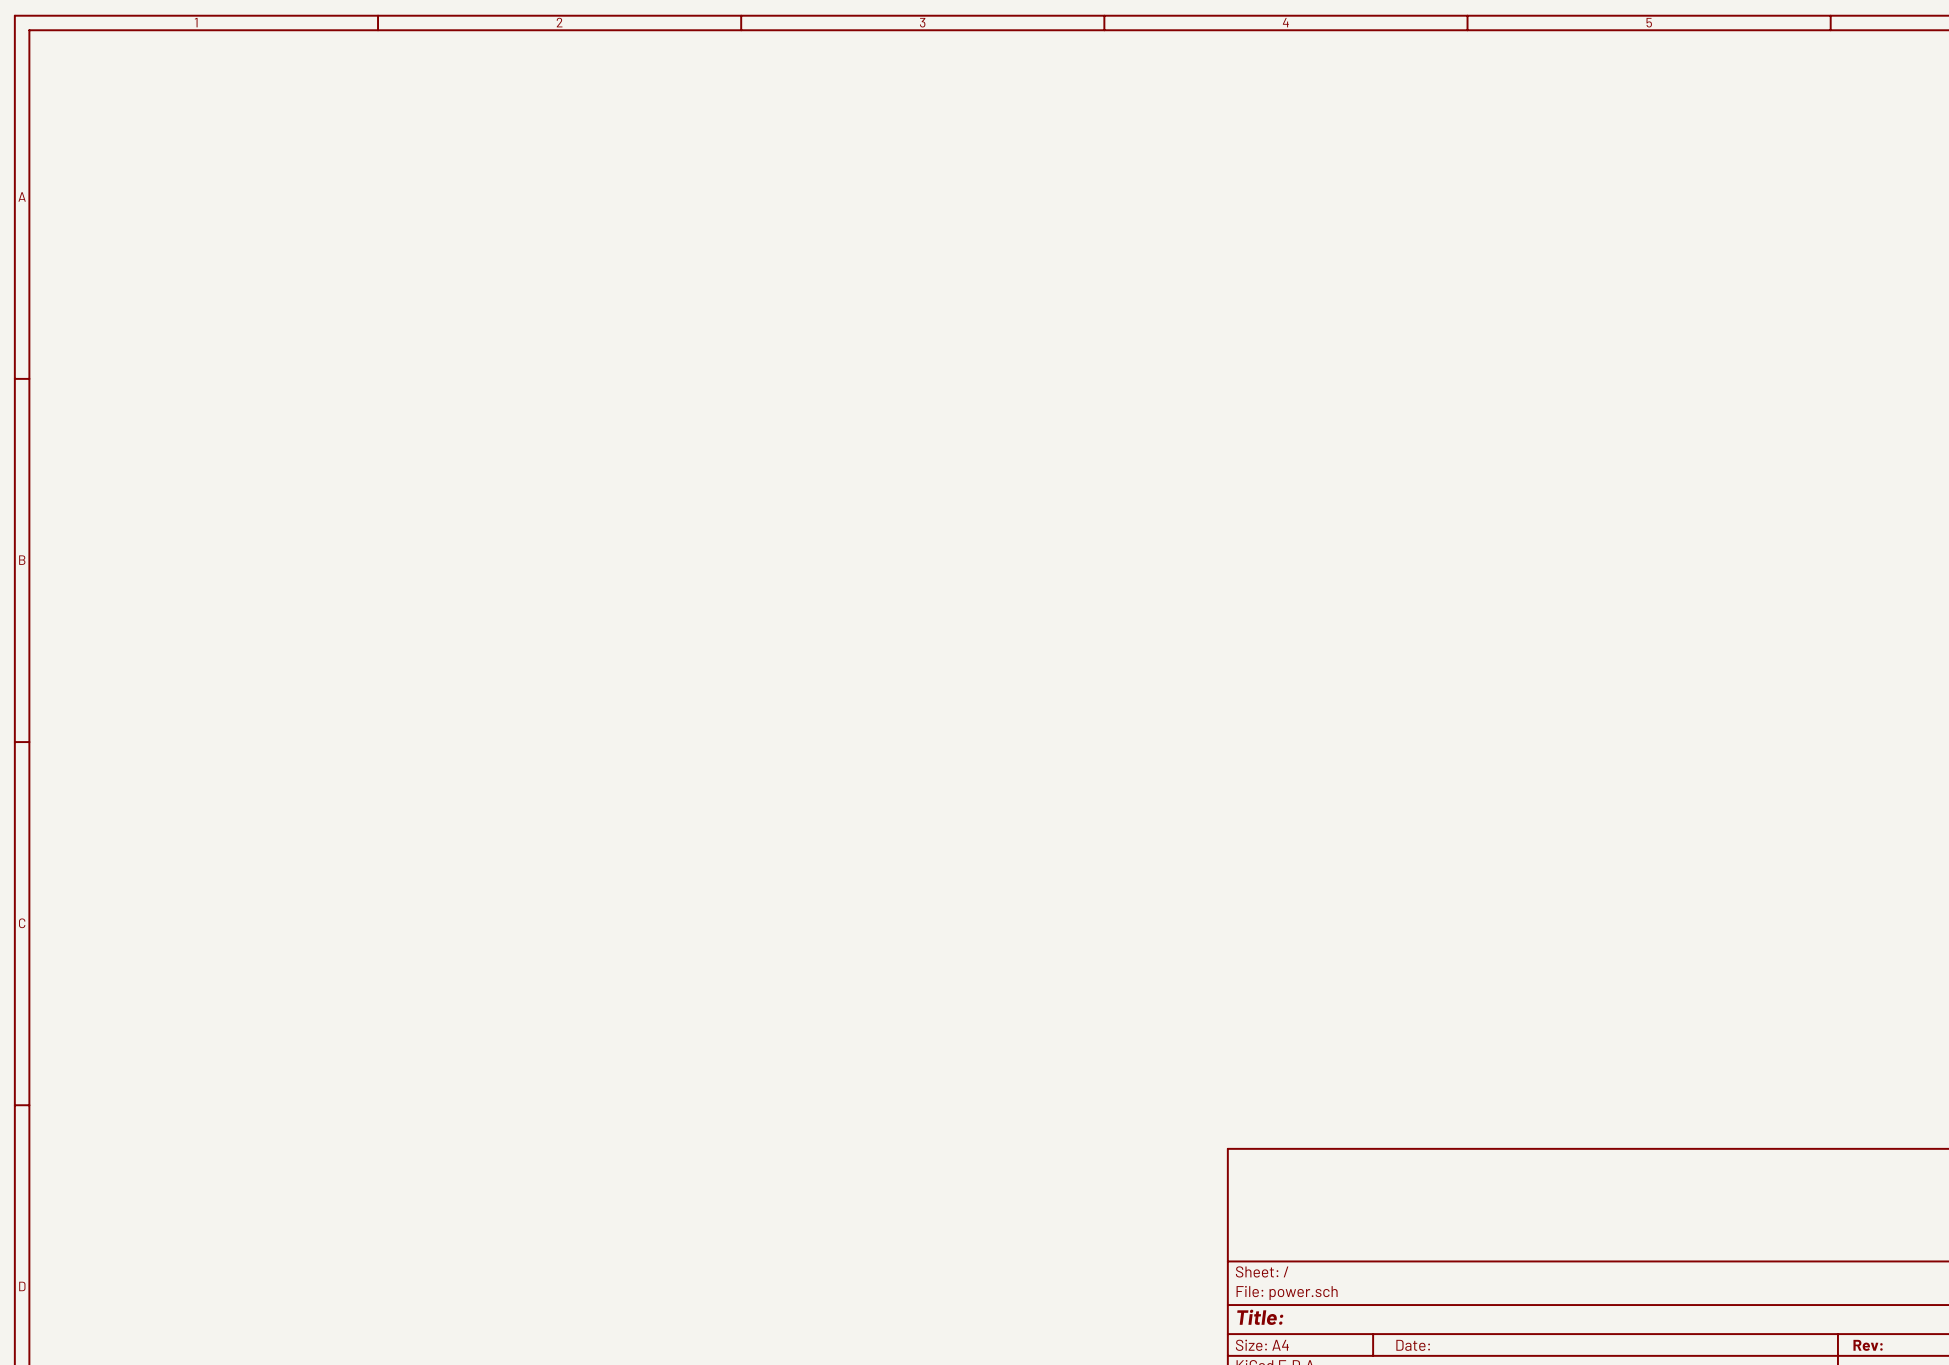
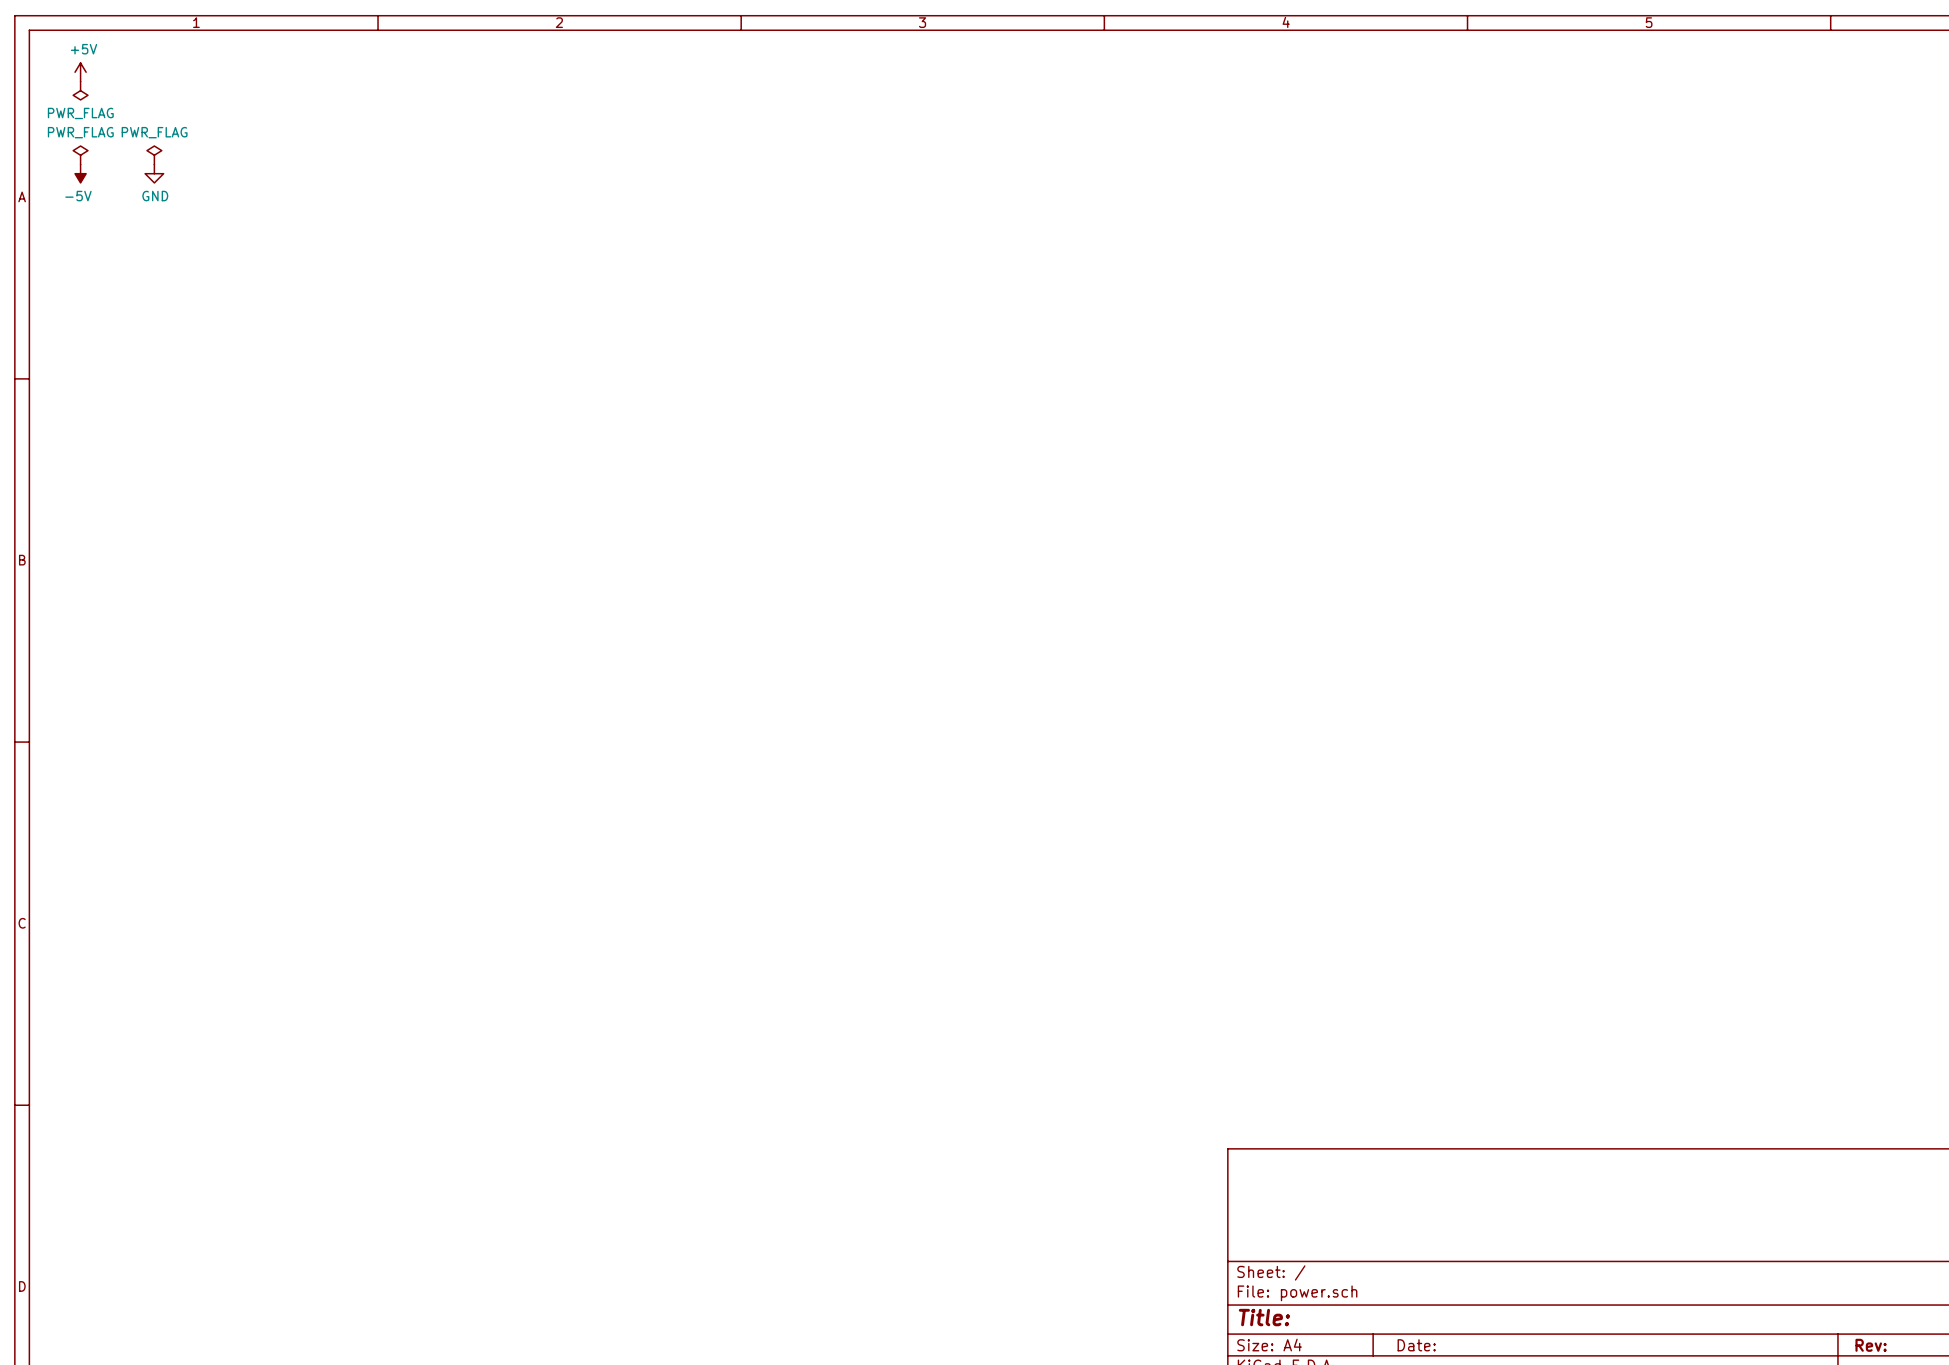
power symbol: none -> +5V (80, 72)
power symbol: none -> PWR_FLAG (80, 90)
power symbol: none -> PWR_FLAG (80, 155)
power symbol: none -> PWR_FLAG (154, 155)
power symbol: none -> -5V (80, 173)
power symbol: none -> GND (154, 173)

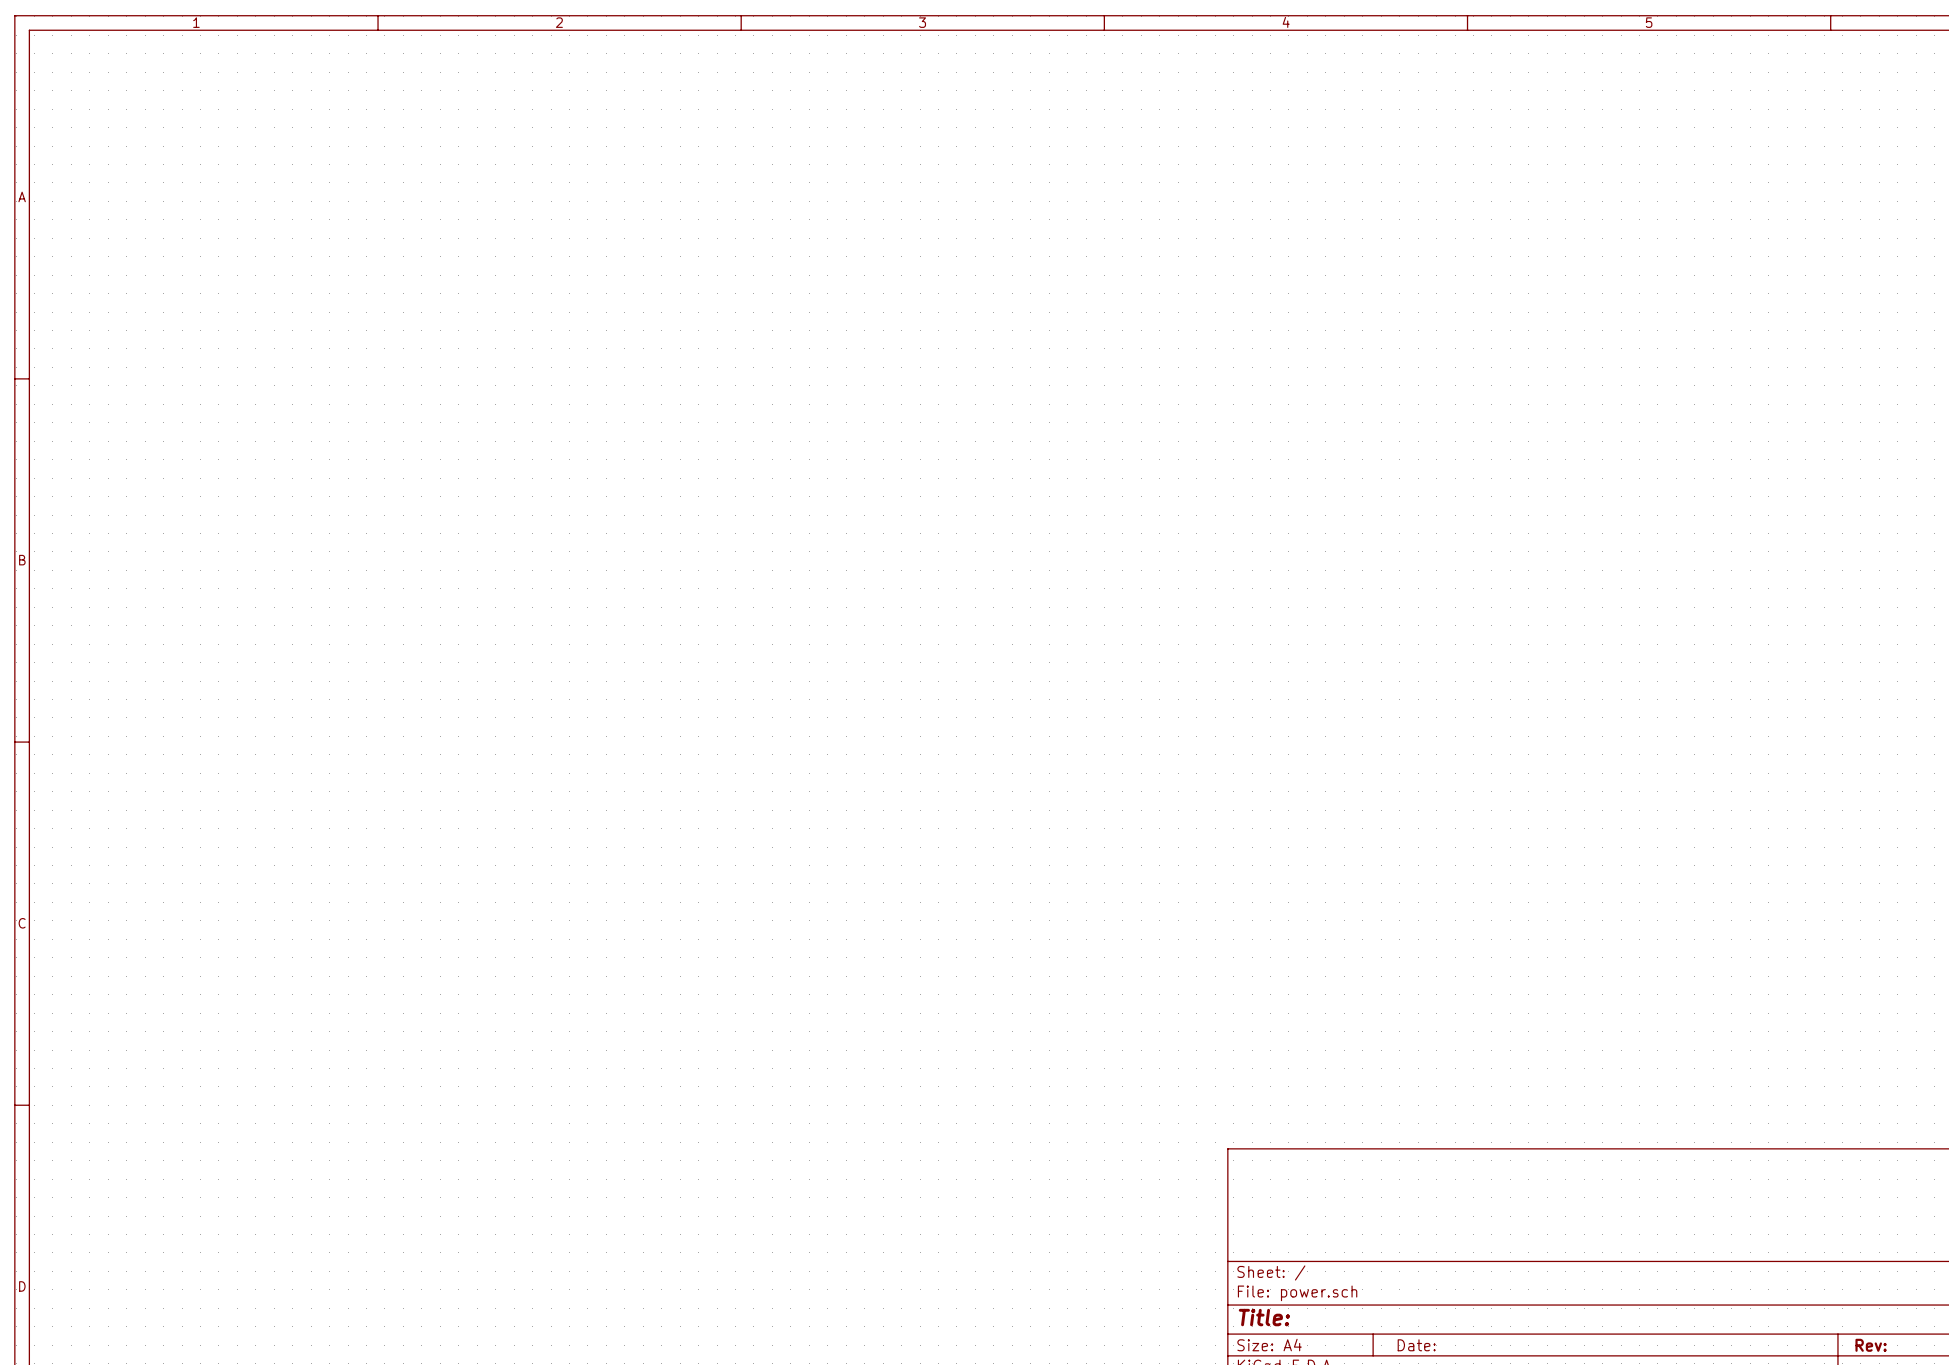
power symbol: +5V (80, 72) -> none
power symbol: PWR_FLAG (80, 90) -> none
power symbol: PWR_FLAG (80, 155) -> none
power symbol: PWR_FLAG (154, 155) -> none
power symbol: -5V (80, 173) -> none
power symbol: GND (154, 173) -> none

